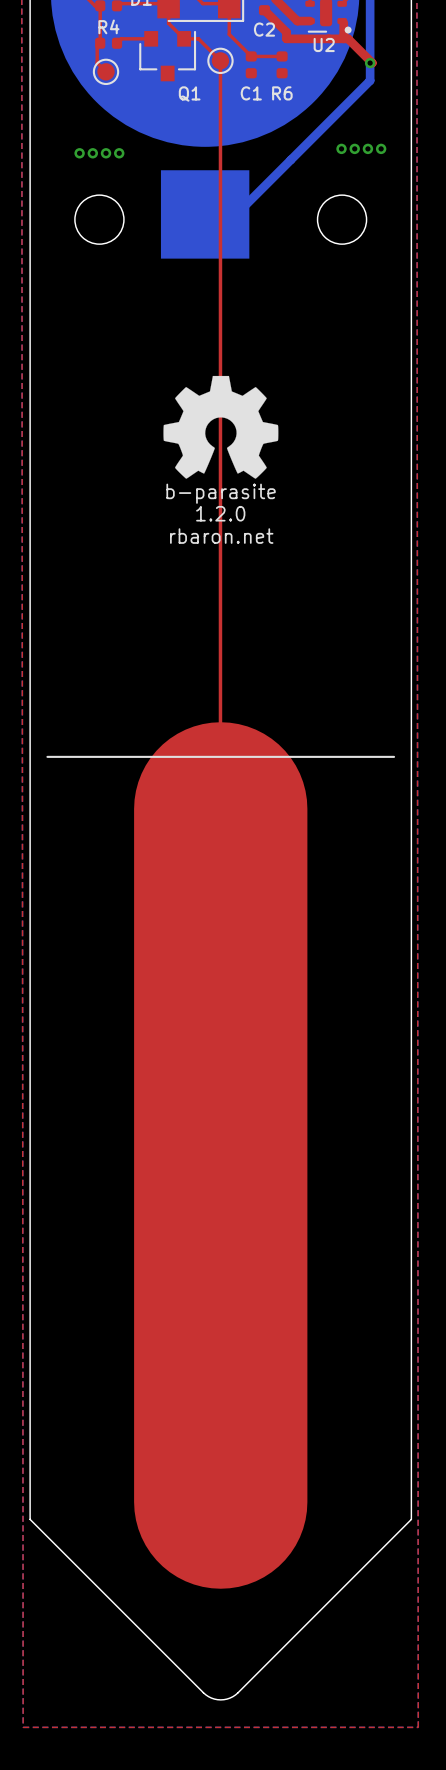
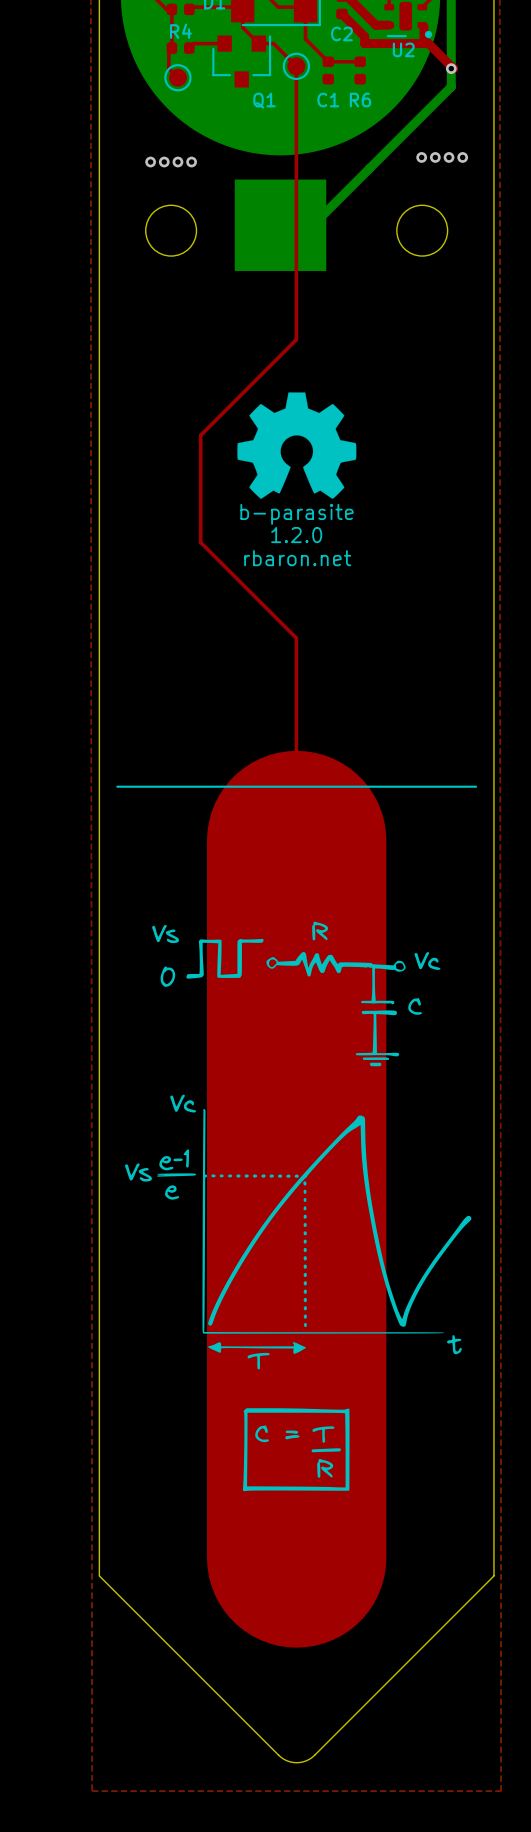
top track: (220, 324) (220, 613) -> (296, 339) (200, 435) (200, 542) (296, 638)
drawing: none -> [125, 921, 472, 1492]

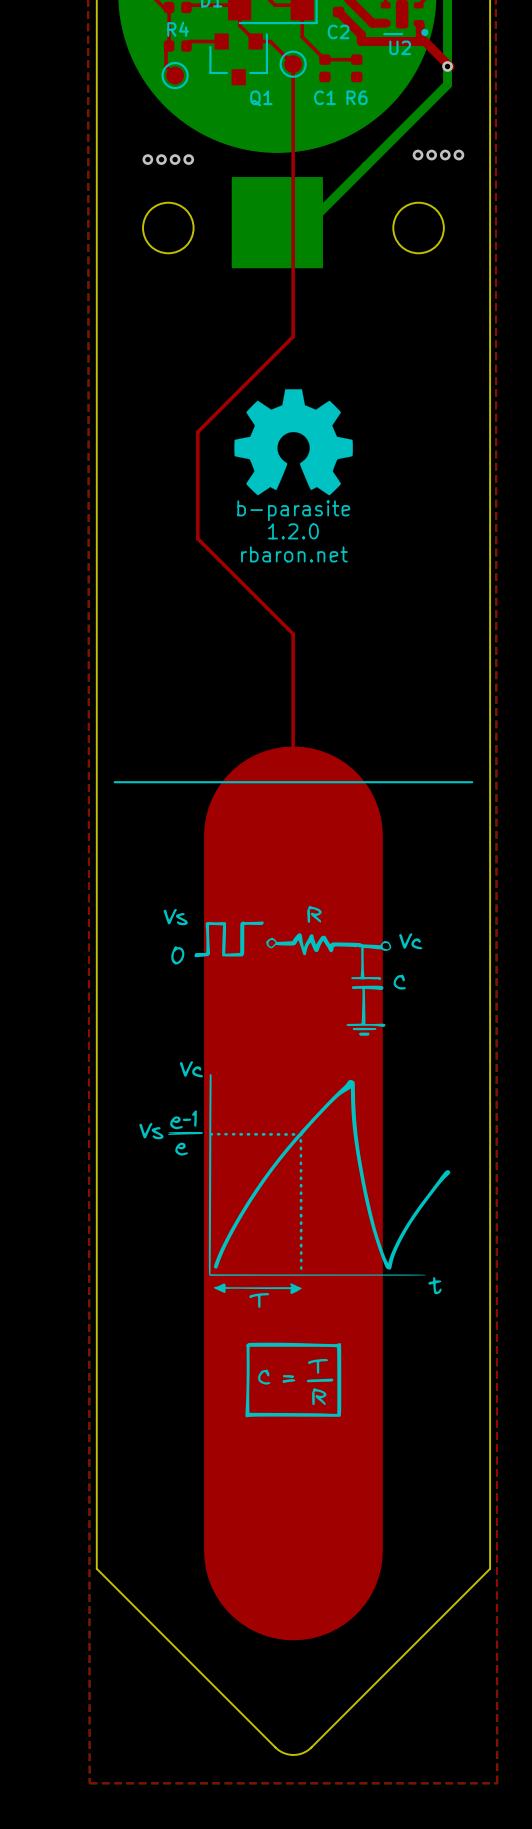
drawing: none -> [139, 905, 451, 1418]
drawing: [125, 921, 472, 1492] -> none

